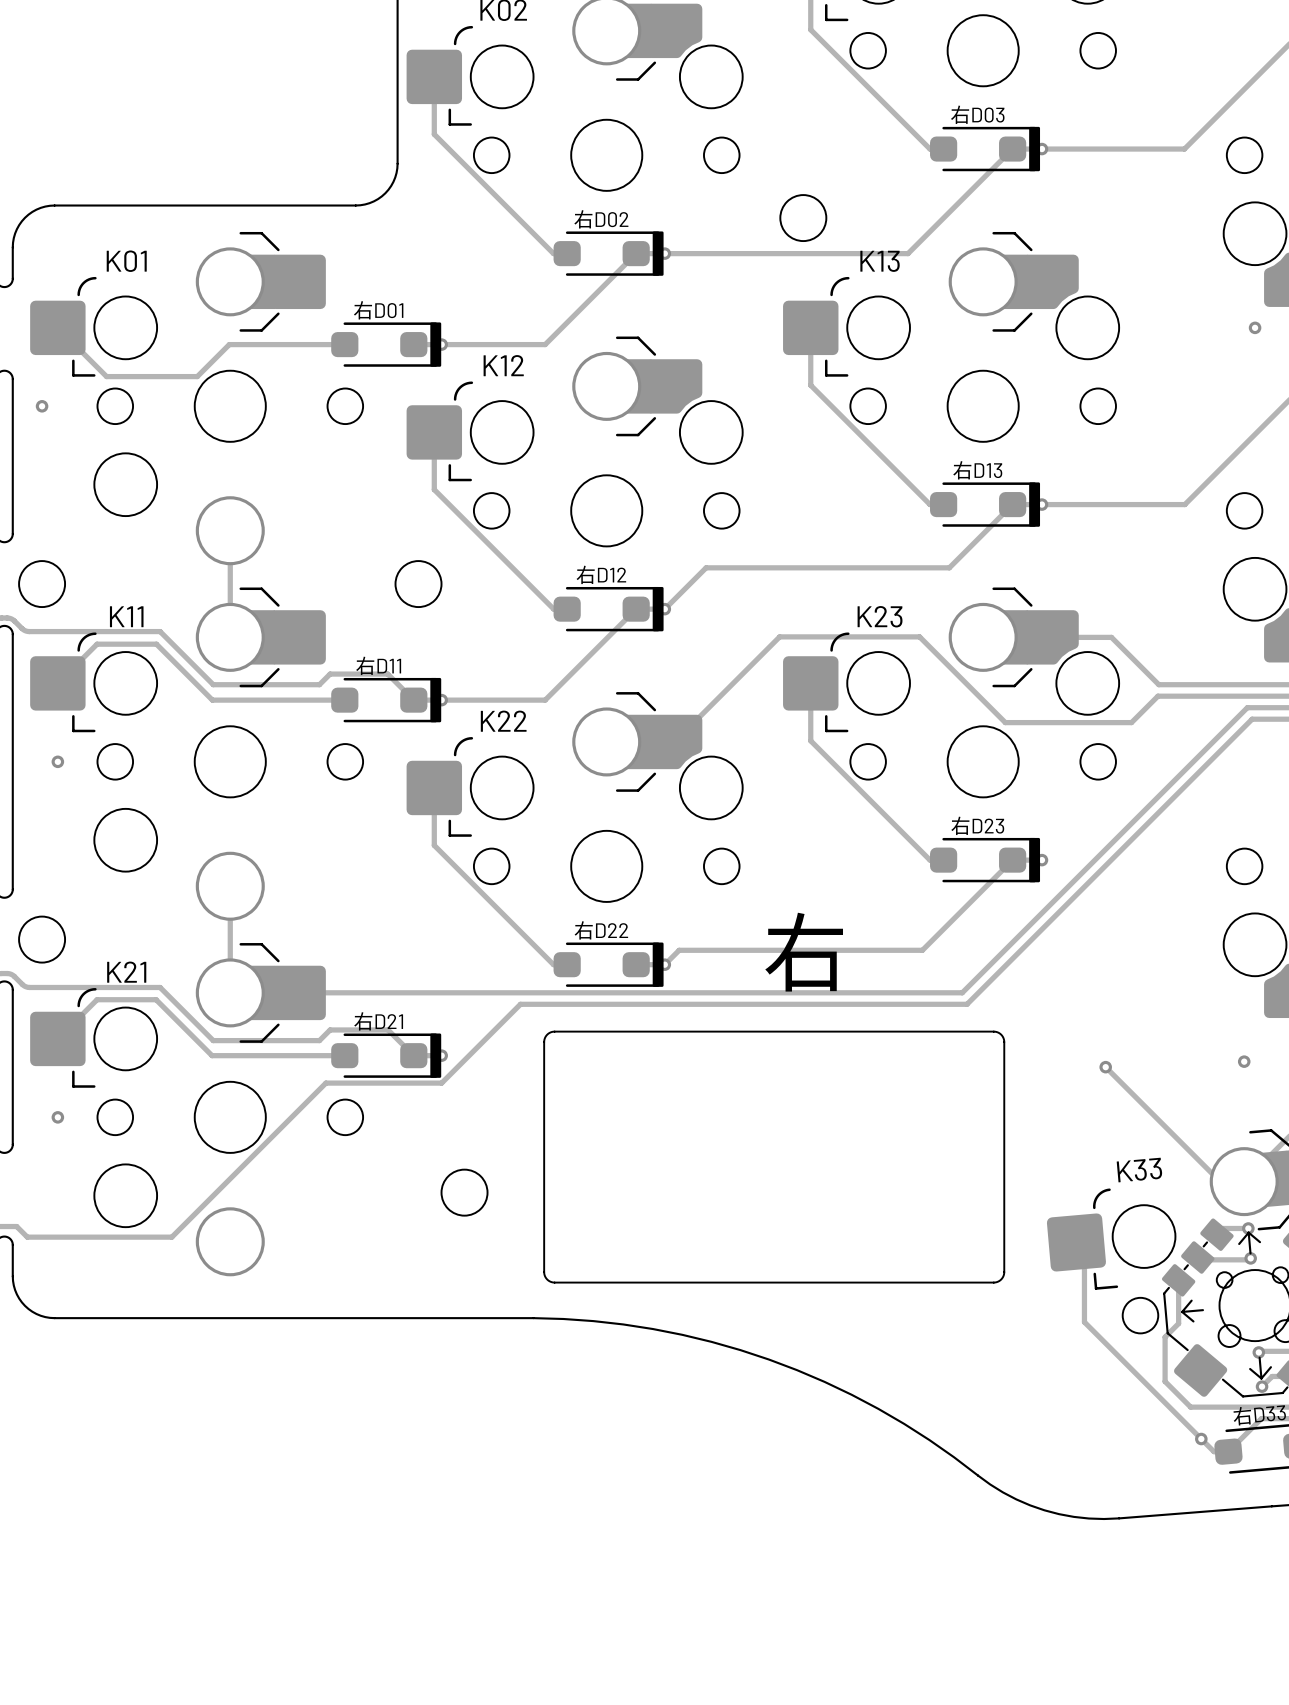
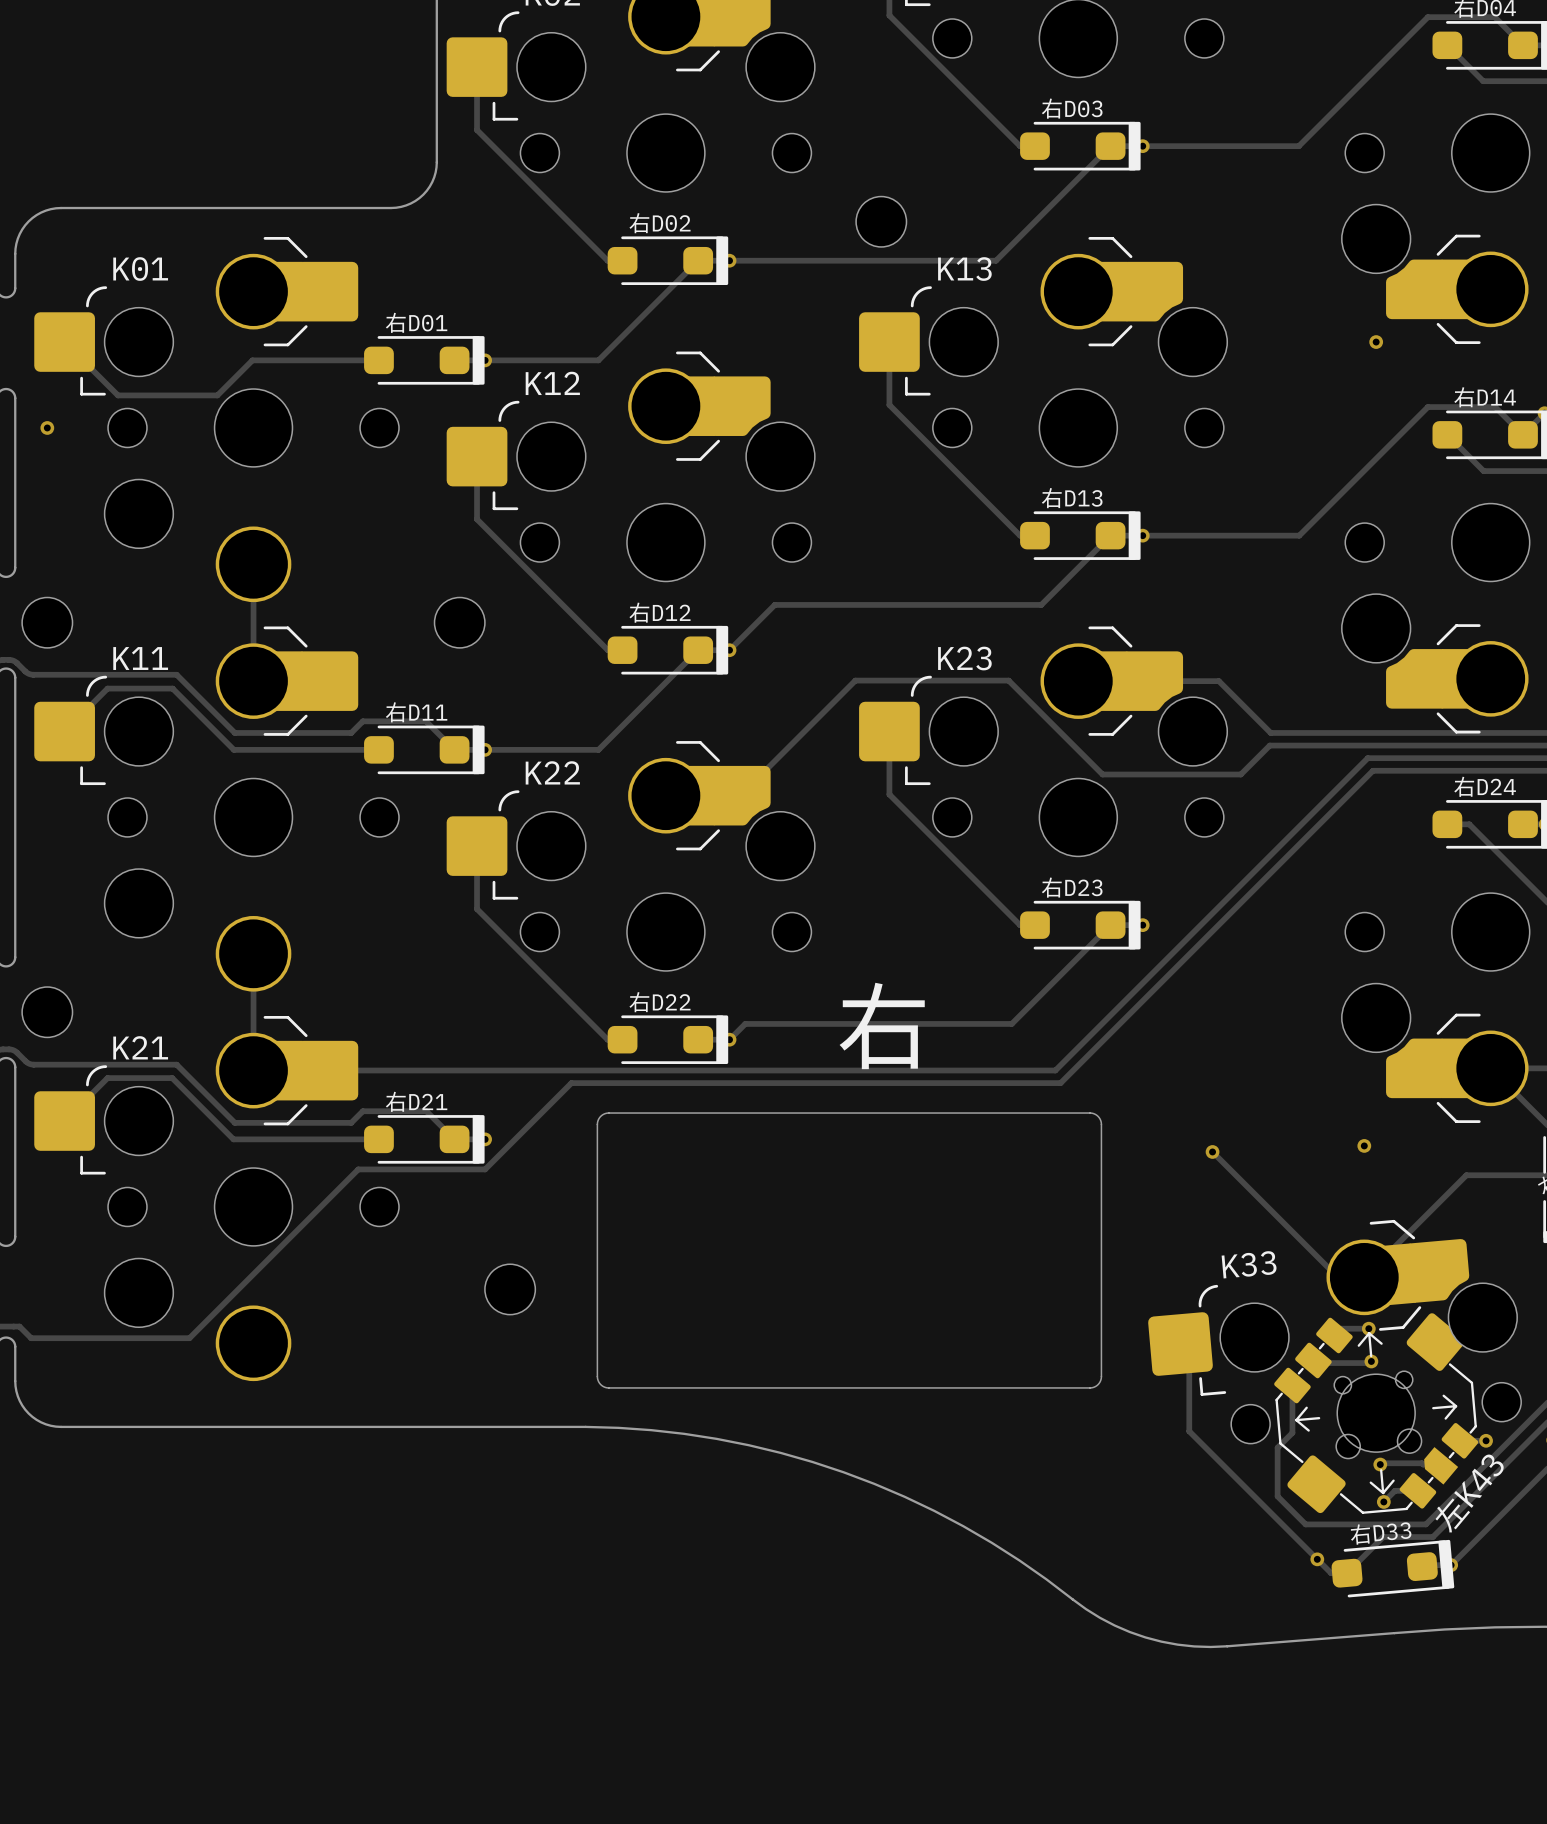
via: (57, 761) -> none
via: (57, 1117) -> none

